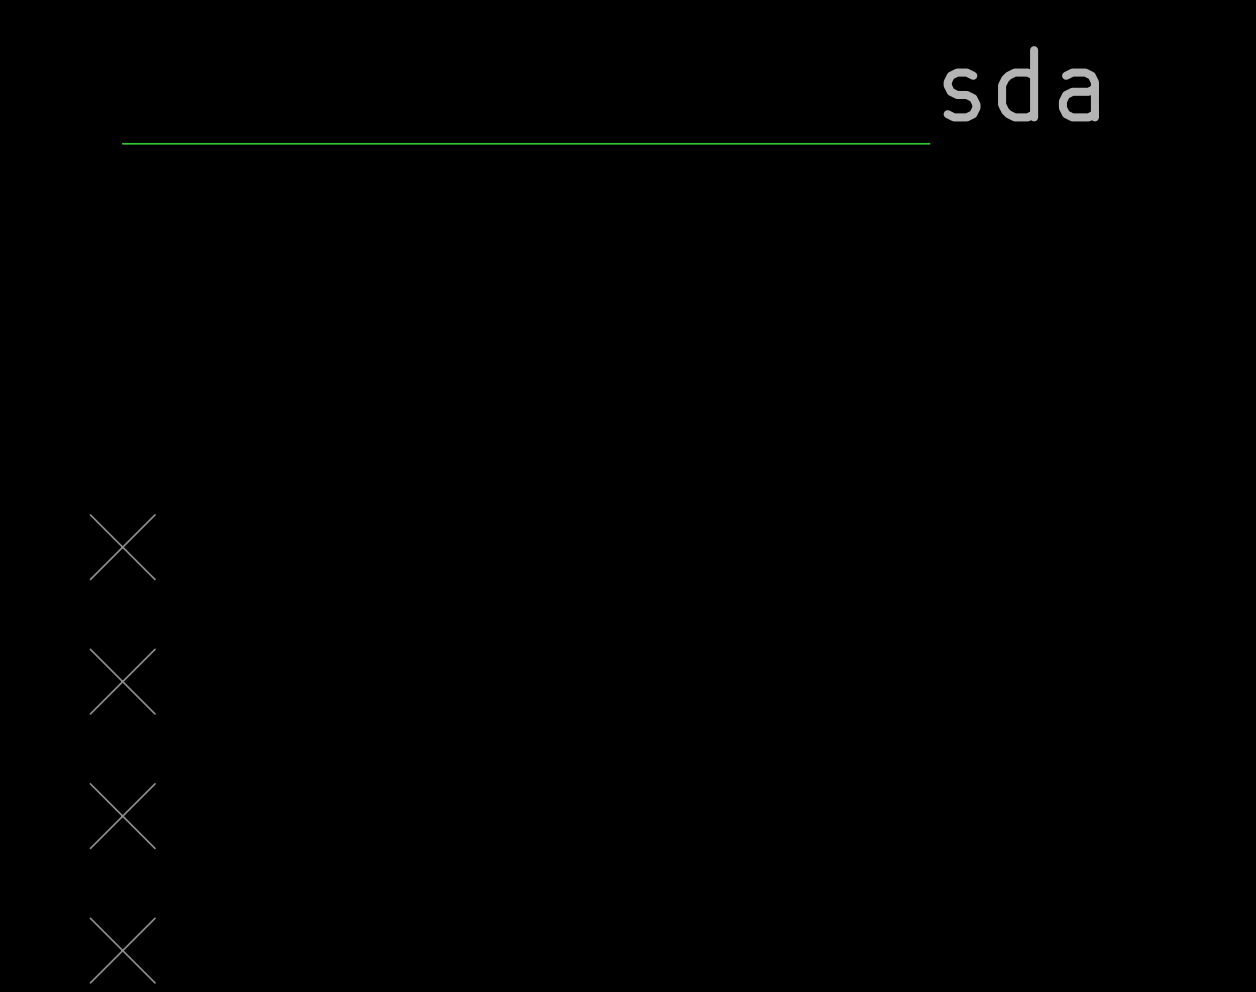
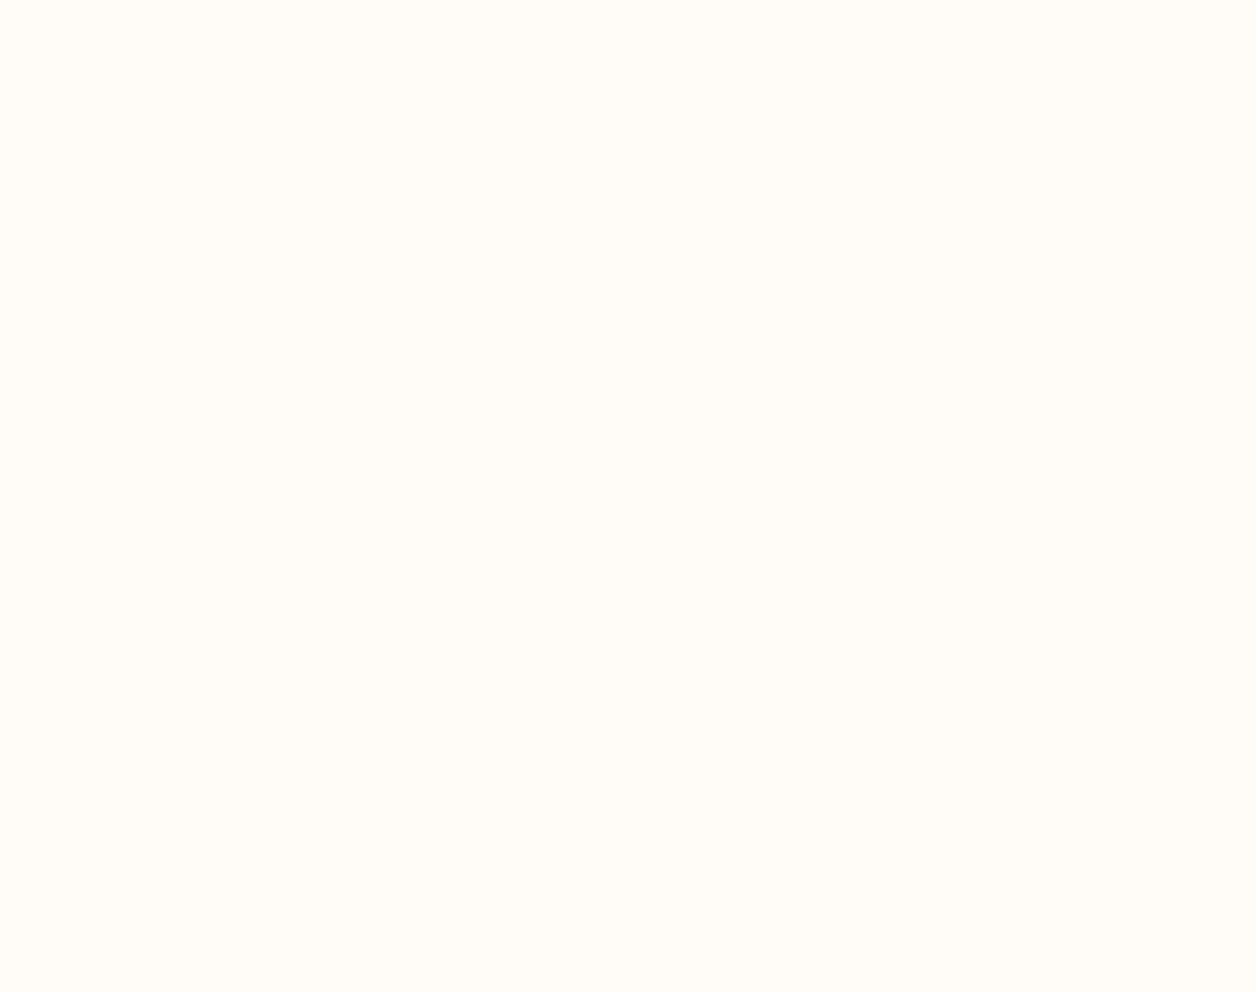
label: sda (1021, 83) -> none
wire: (122, 143) (929, 143) -> none
no-connect mark: (122, 547) -> none
no-connect mark: (122, 681) -> none
no-connect mark: (122, 816) -> none
no-connect mark: (122, 950) -> none

